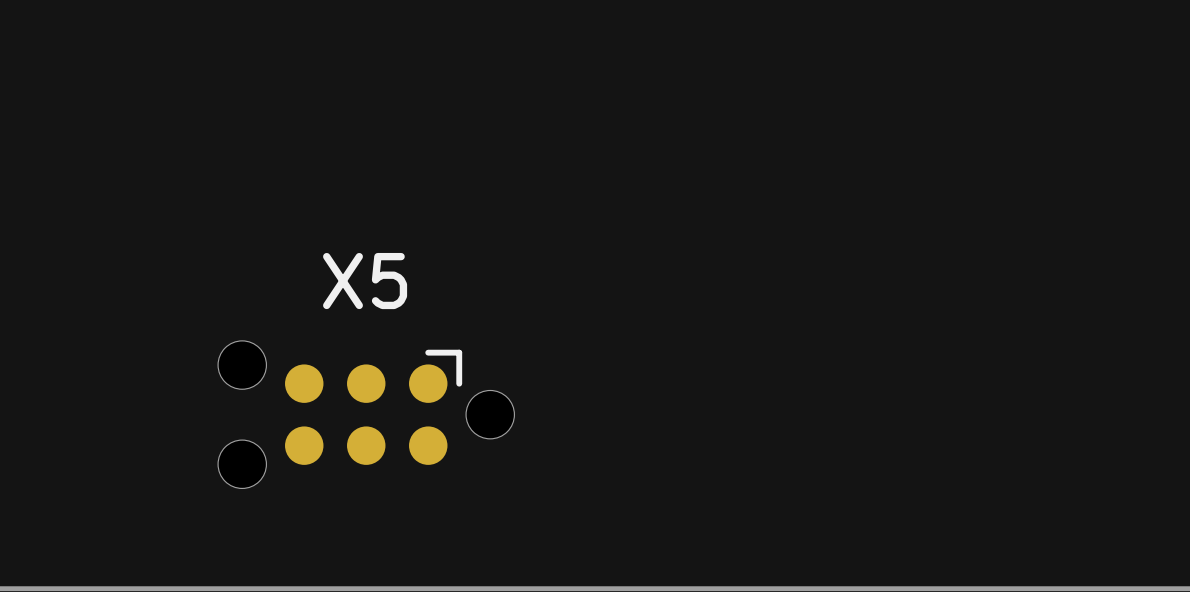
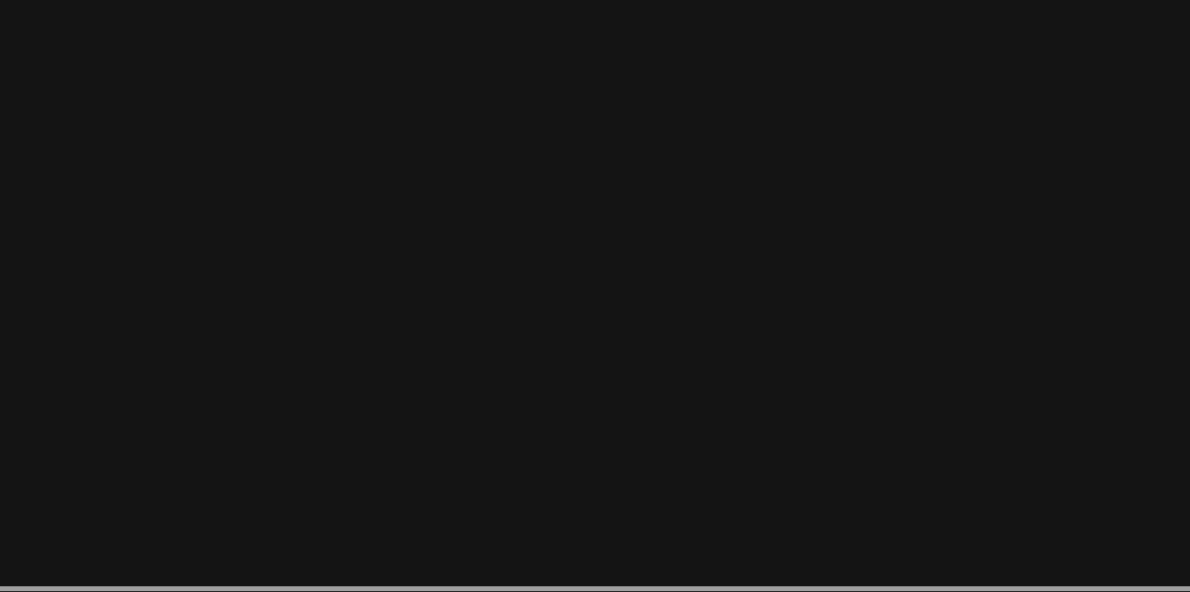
X5: (366, 414) -> none

